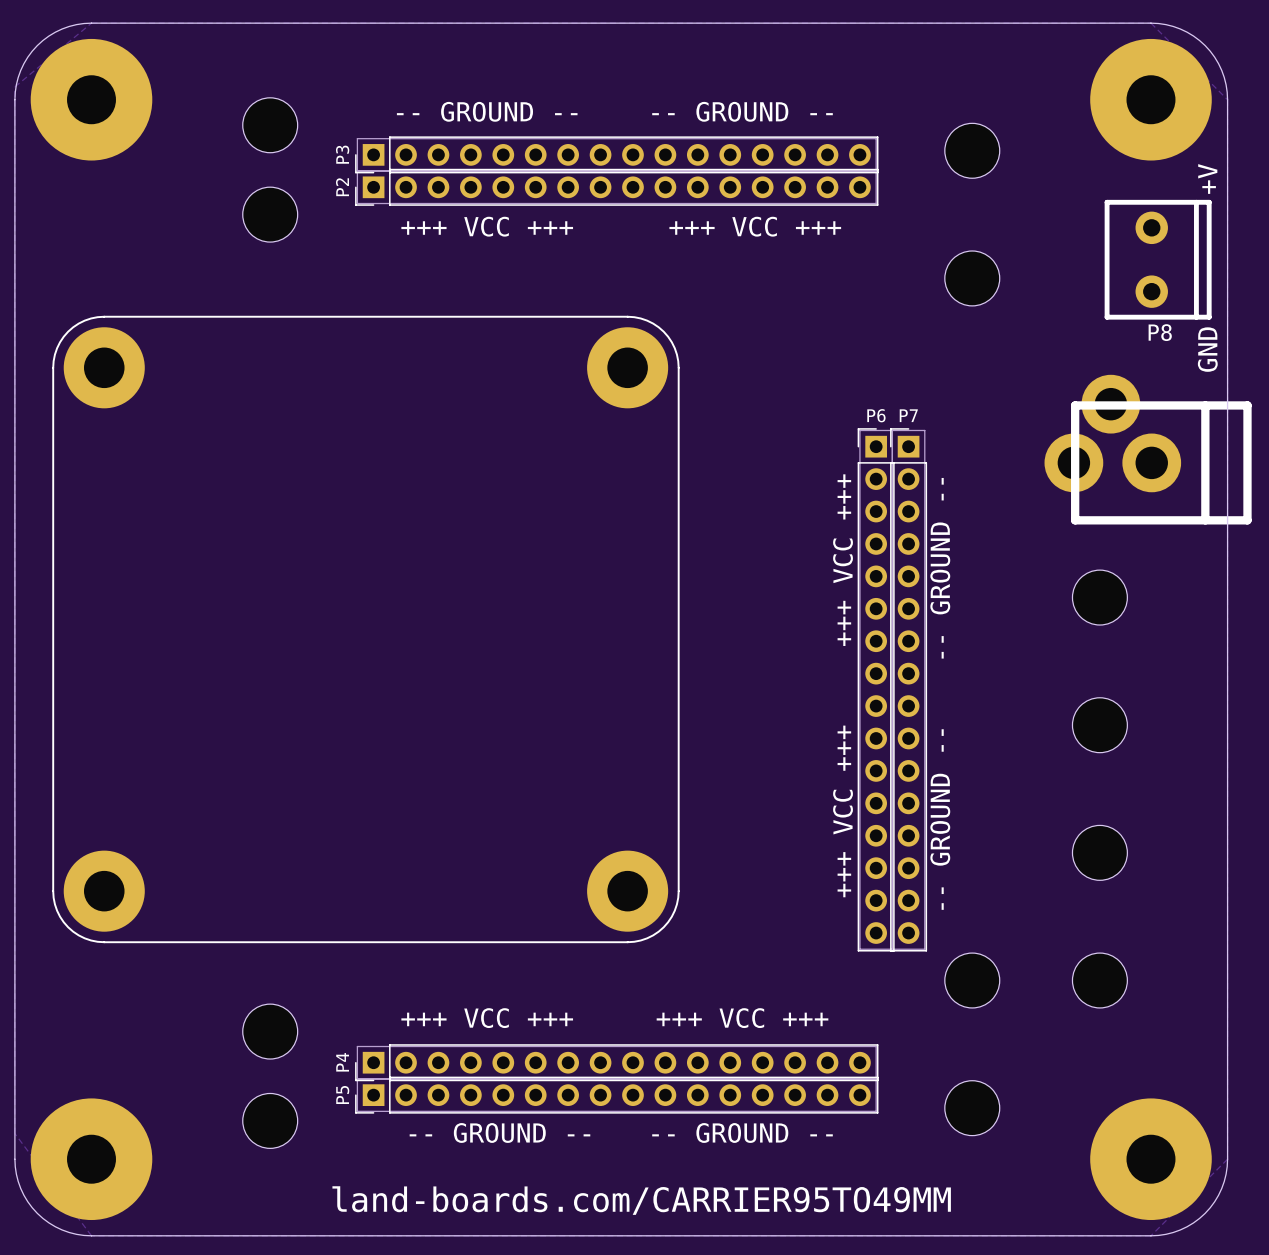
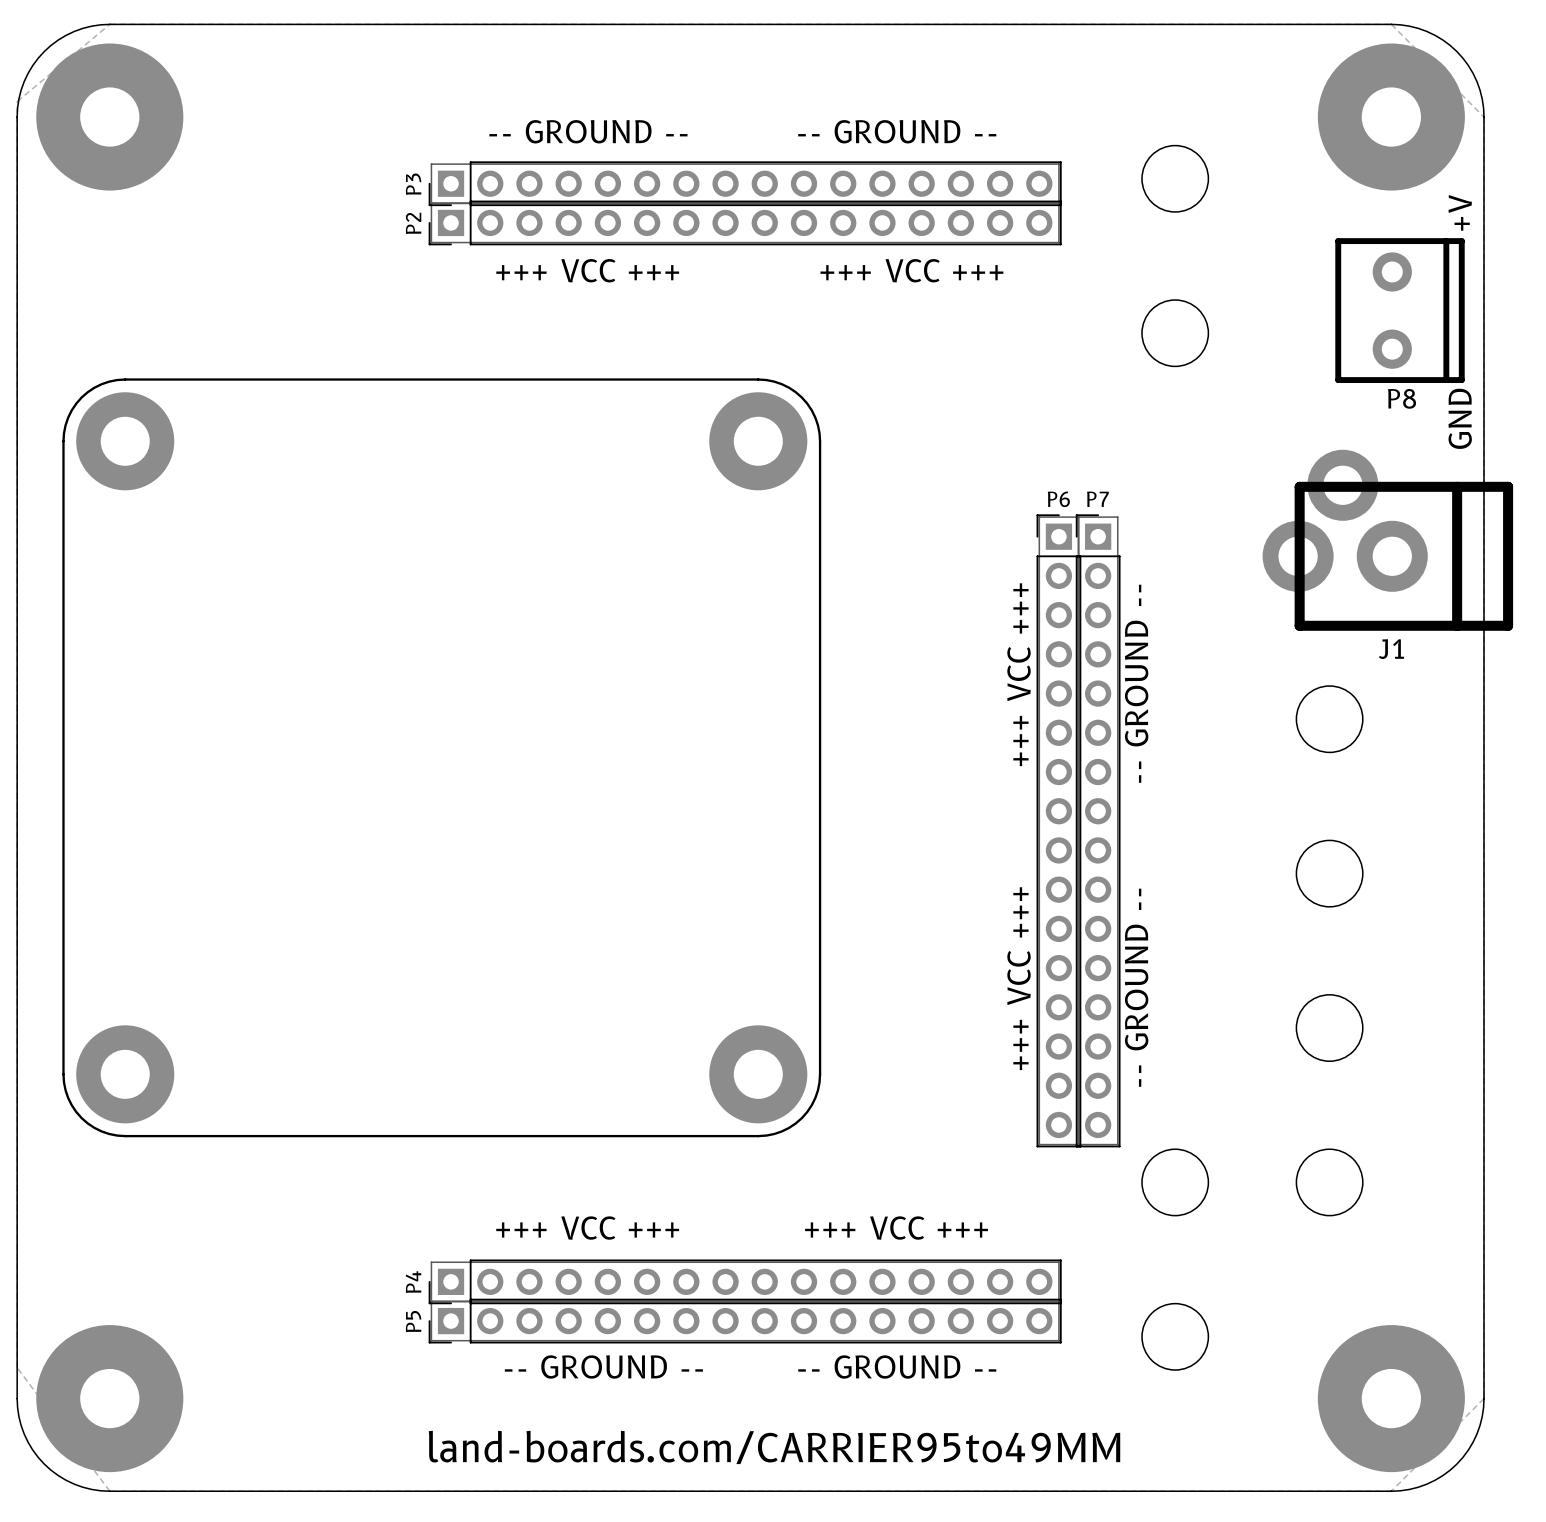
part: (270, 125) -> none
part: (270, 214) -> none
J1 name: none -> J1 (1391, 649)
part: (270, 1031) -> none
part: (270, 1120) -> none
text: land-boards.com/CARRIER95TO49MM (641, 1200) -> land-boards.com/CARRIER95to49MM (774, 1447)

